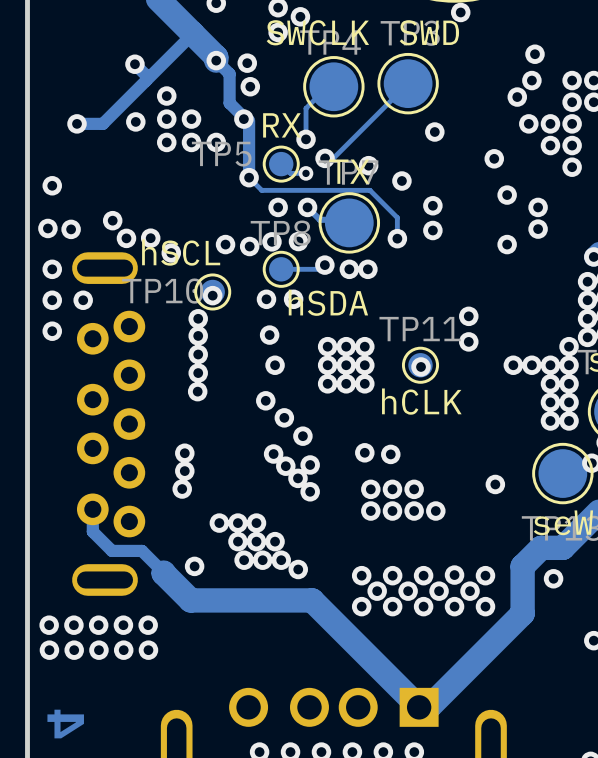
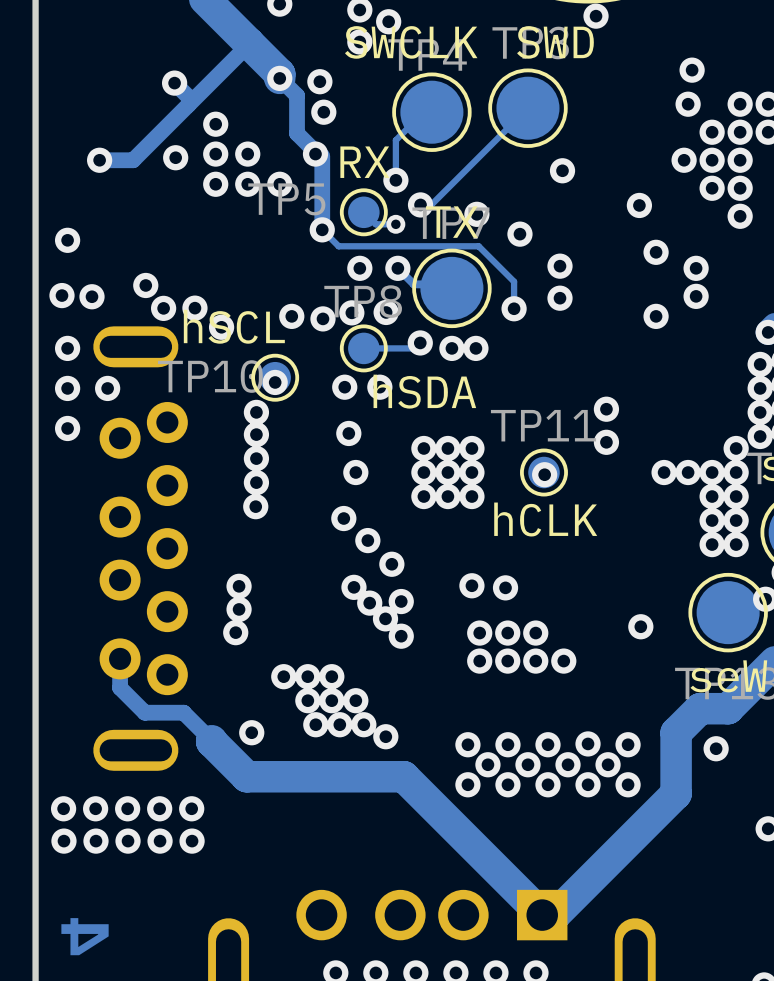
via position: (517, 97) -> (712, 132)

